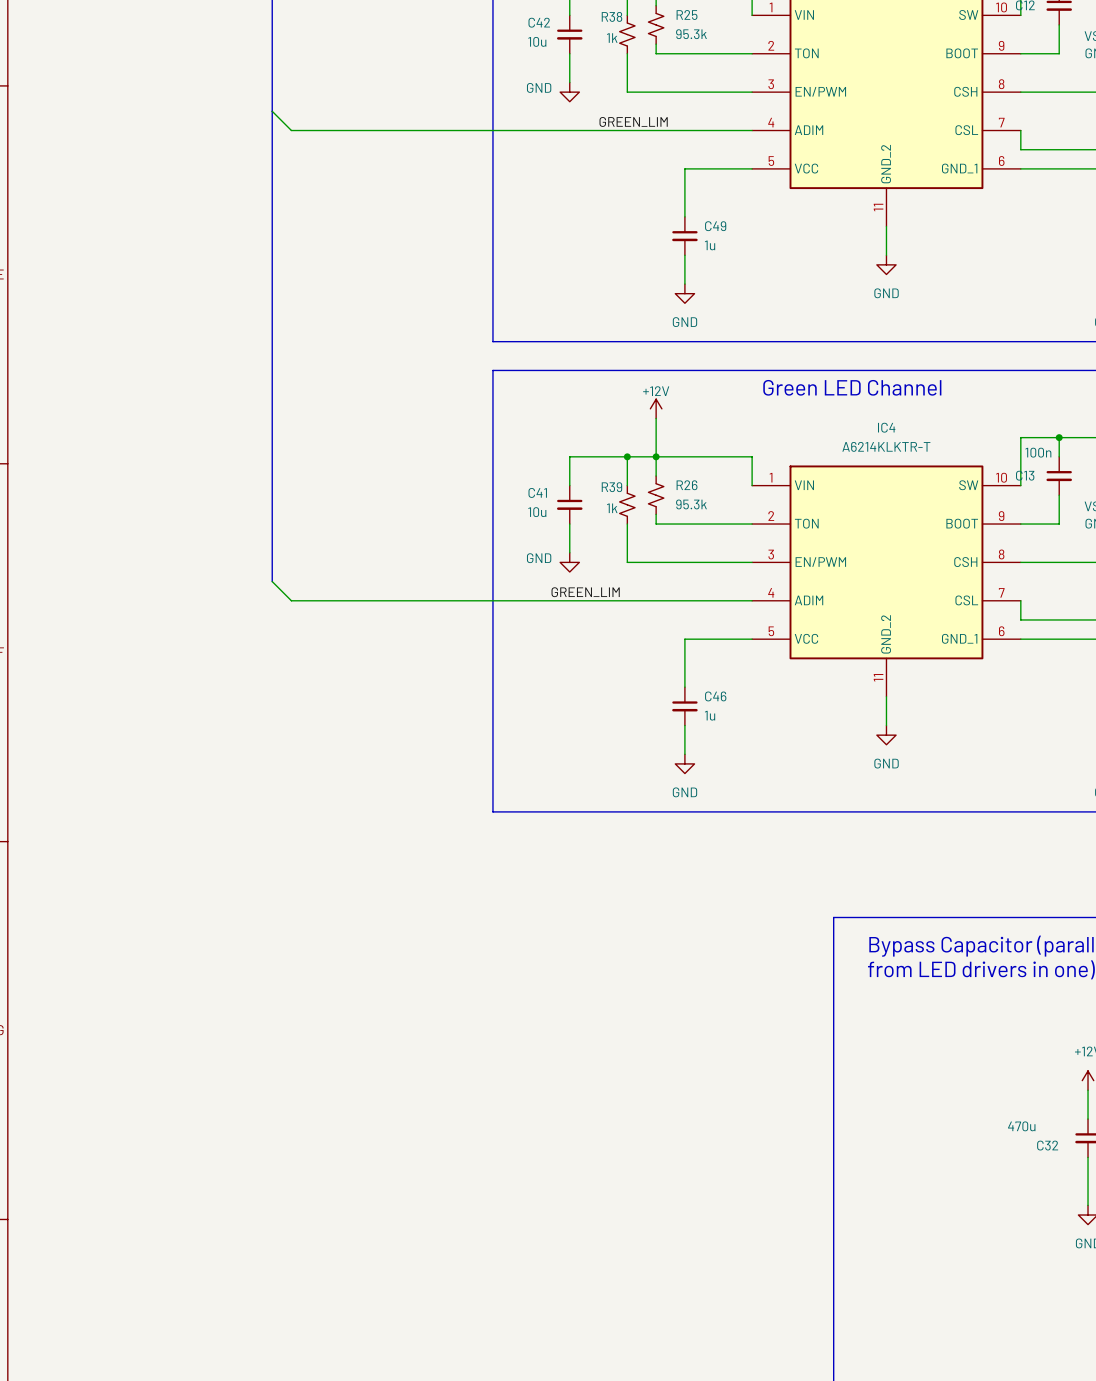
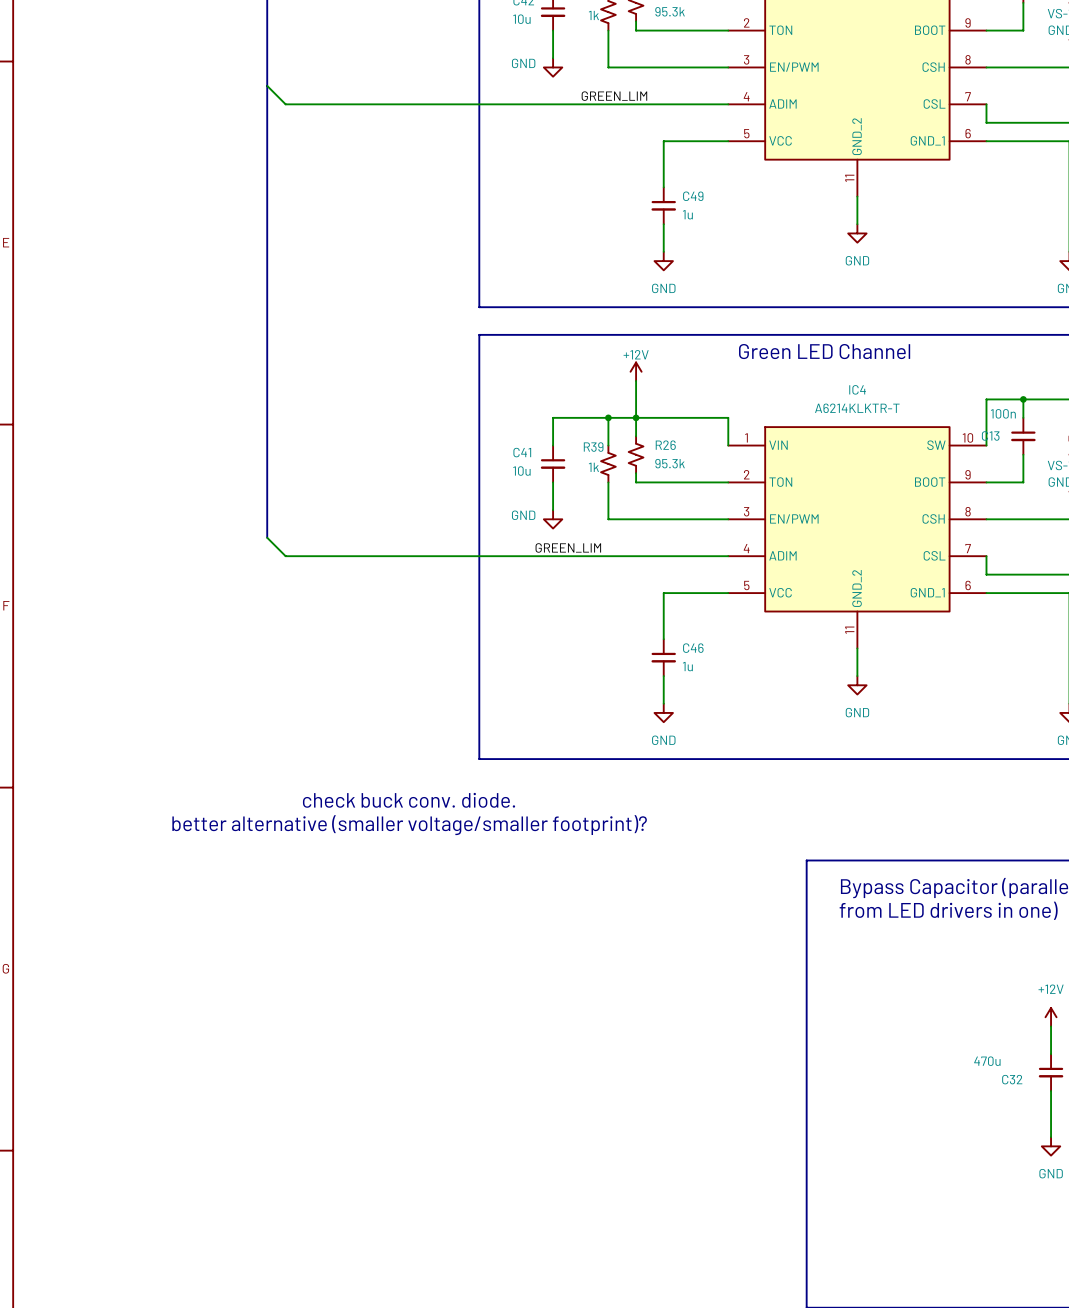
text: none -> check buck conv. diode. (409, 800)
text: none -> better alternative (smaller voltage/smaller footprint)? (409, 825)

